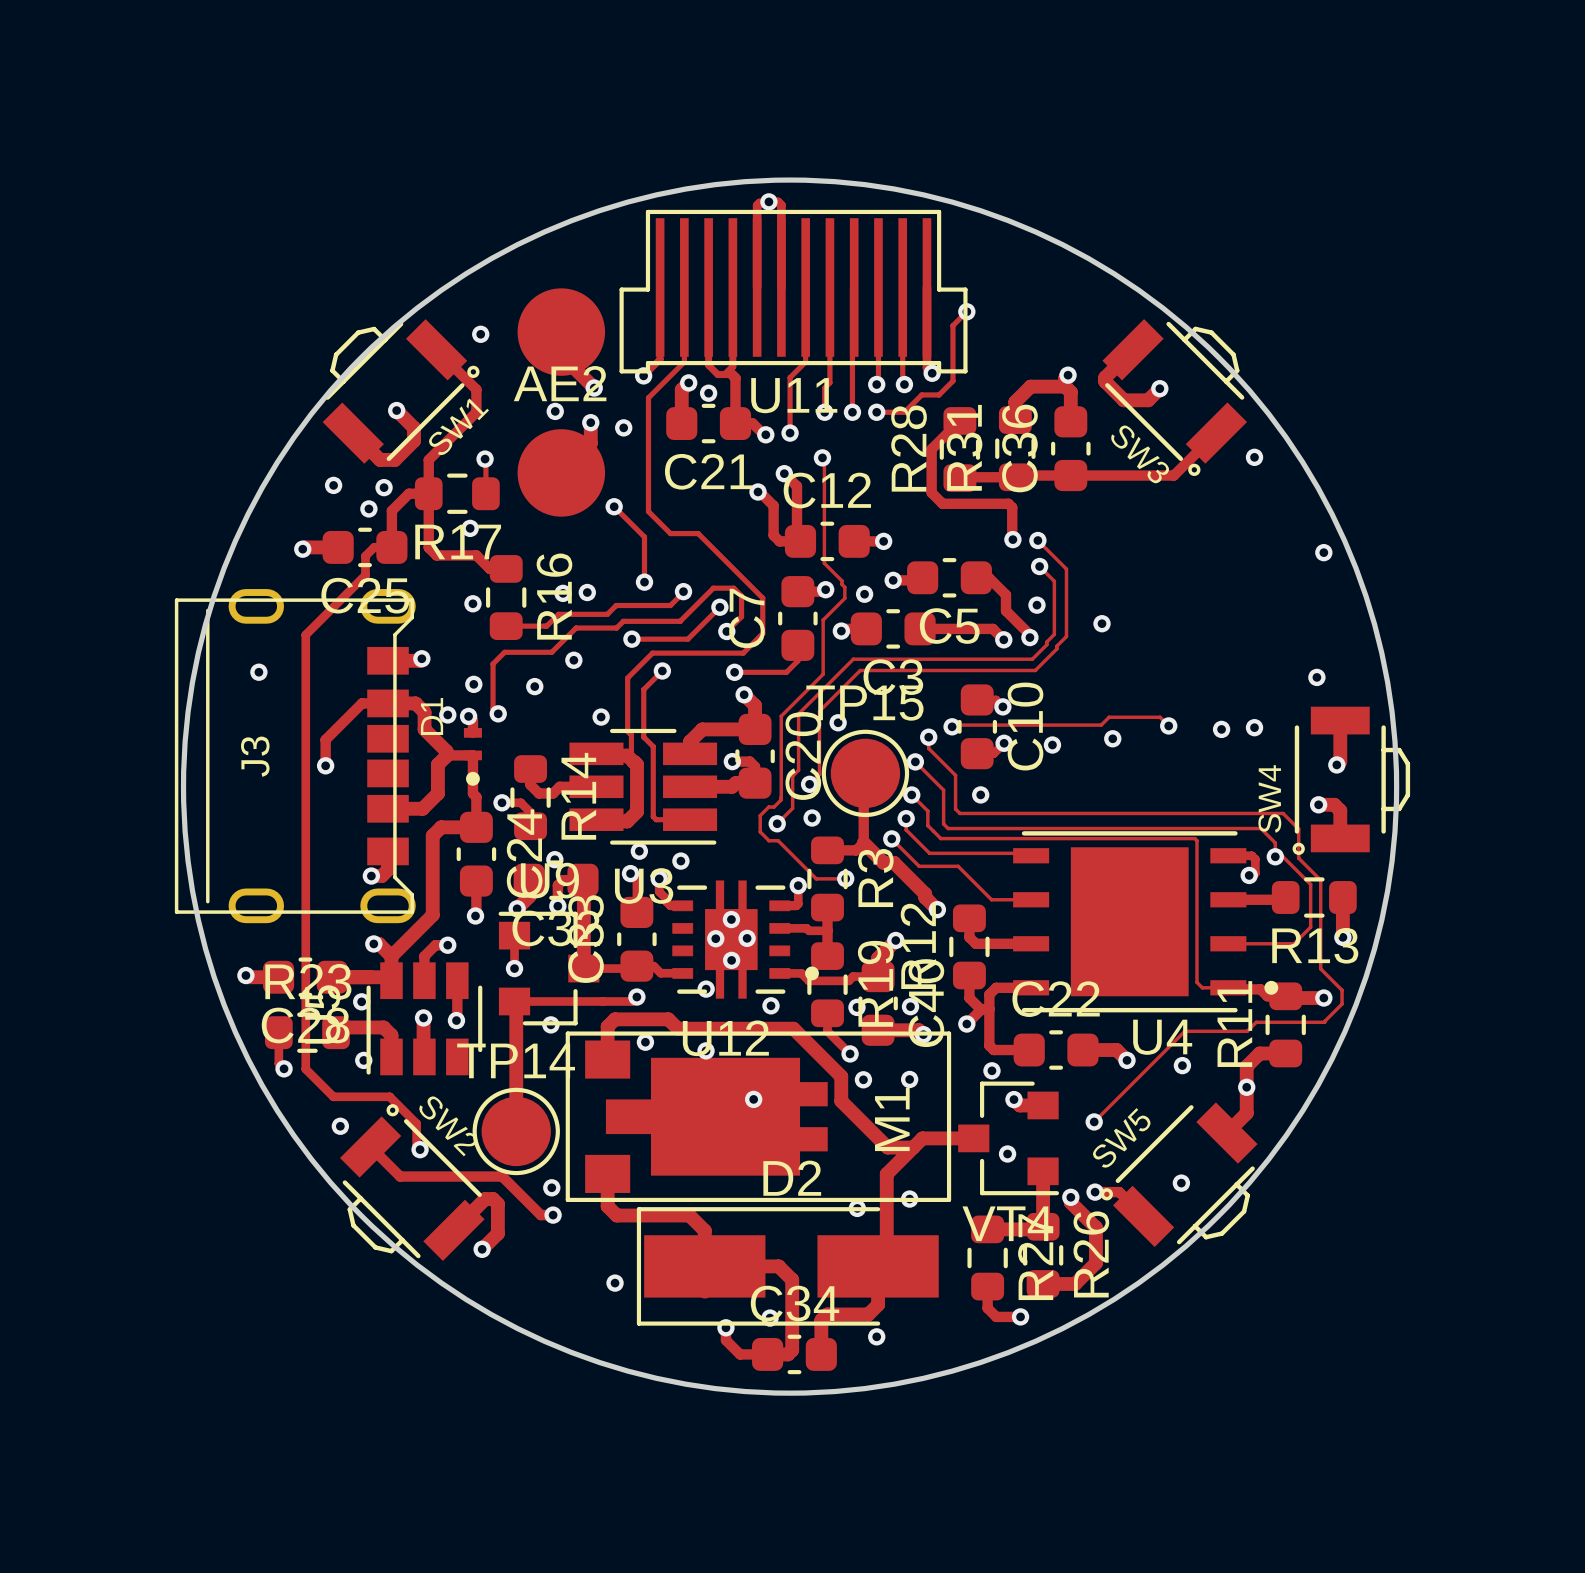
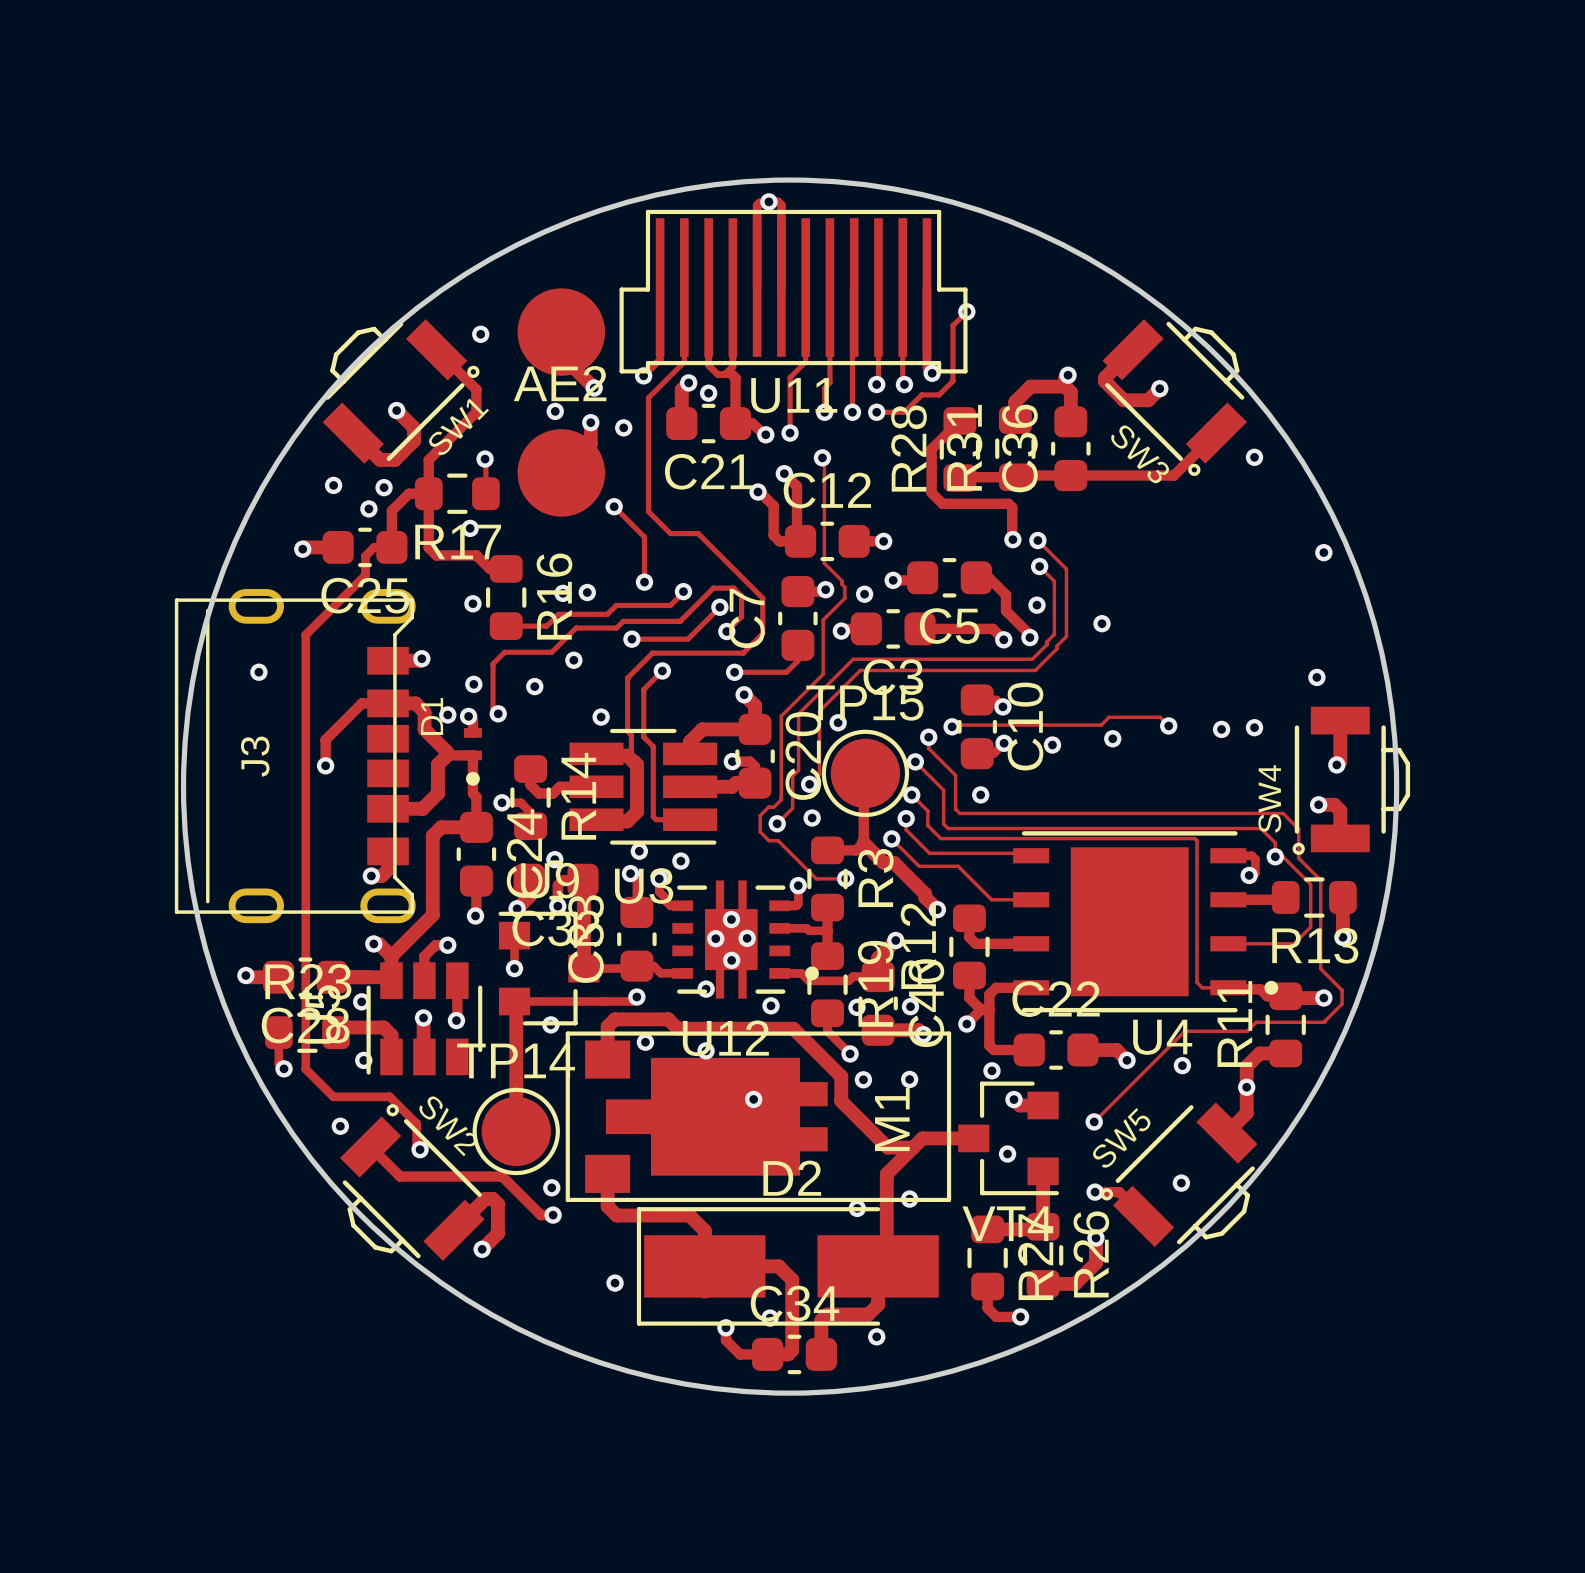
track: (1070, 1197) (1070, 1202) (1095, 1227) (1095, 1238) -> none
via position: (1070, 1197) -> (1095, 1238)

